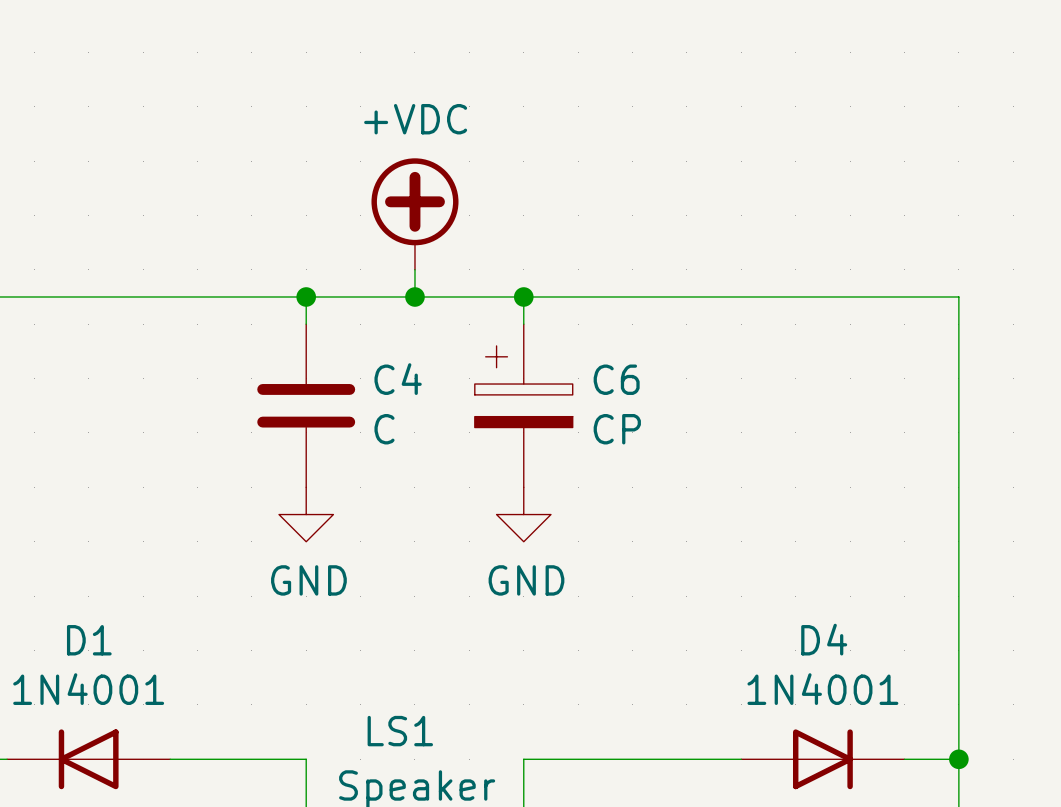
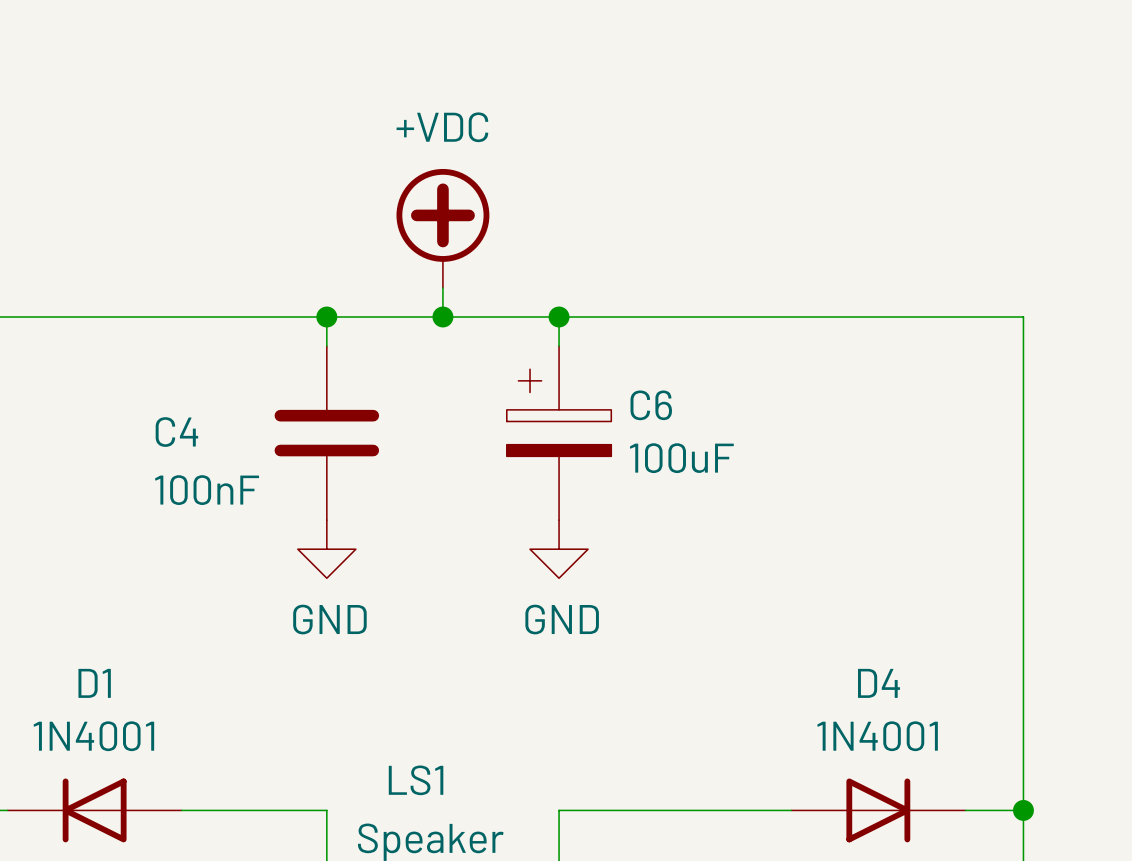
C4 name position: C4 (398, 379) -> C4 (176, 432)
C4 value: C (384, 429) -> 100nF (207, 490)
C6 value: CP (617, 429) -> 100uF (681, 458)

